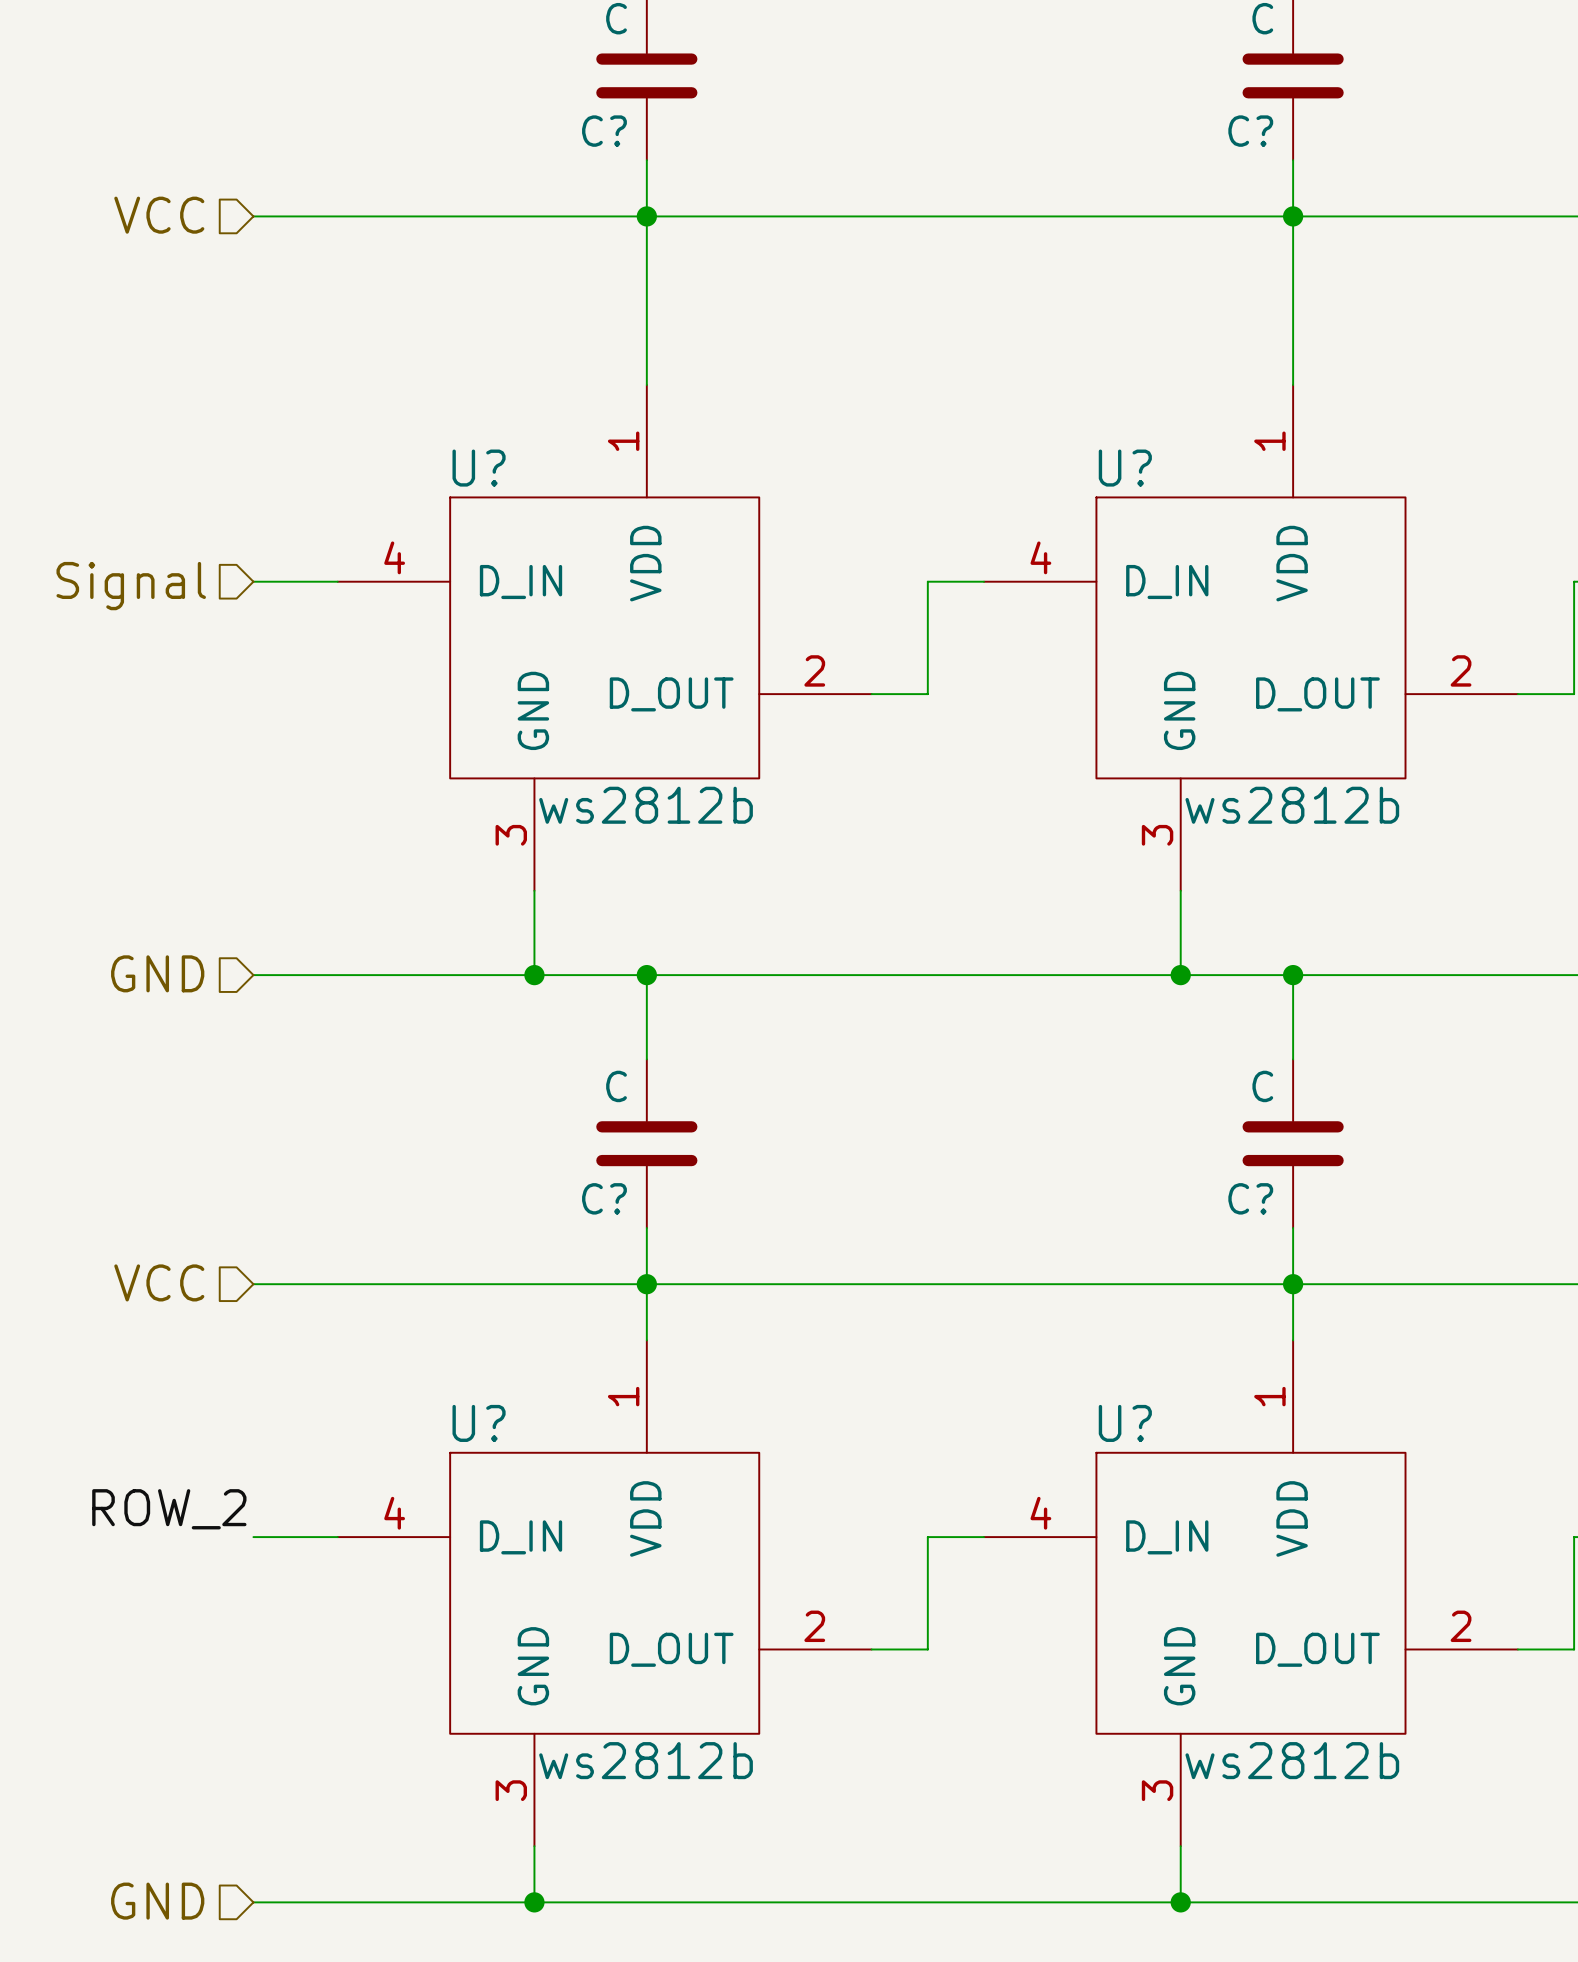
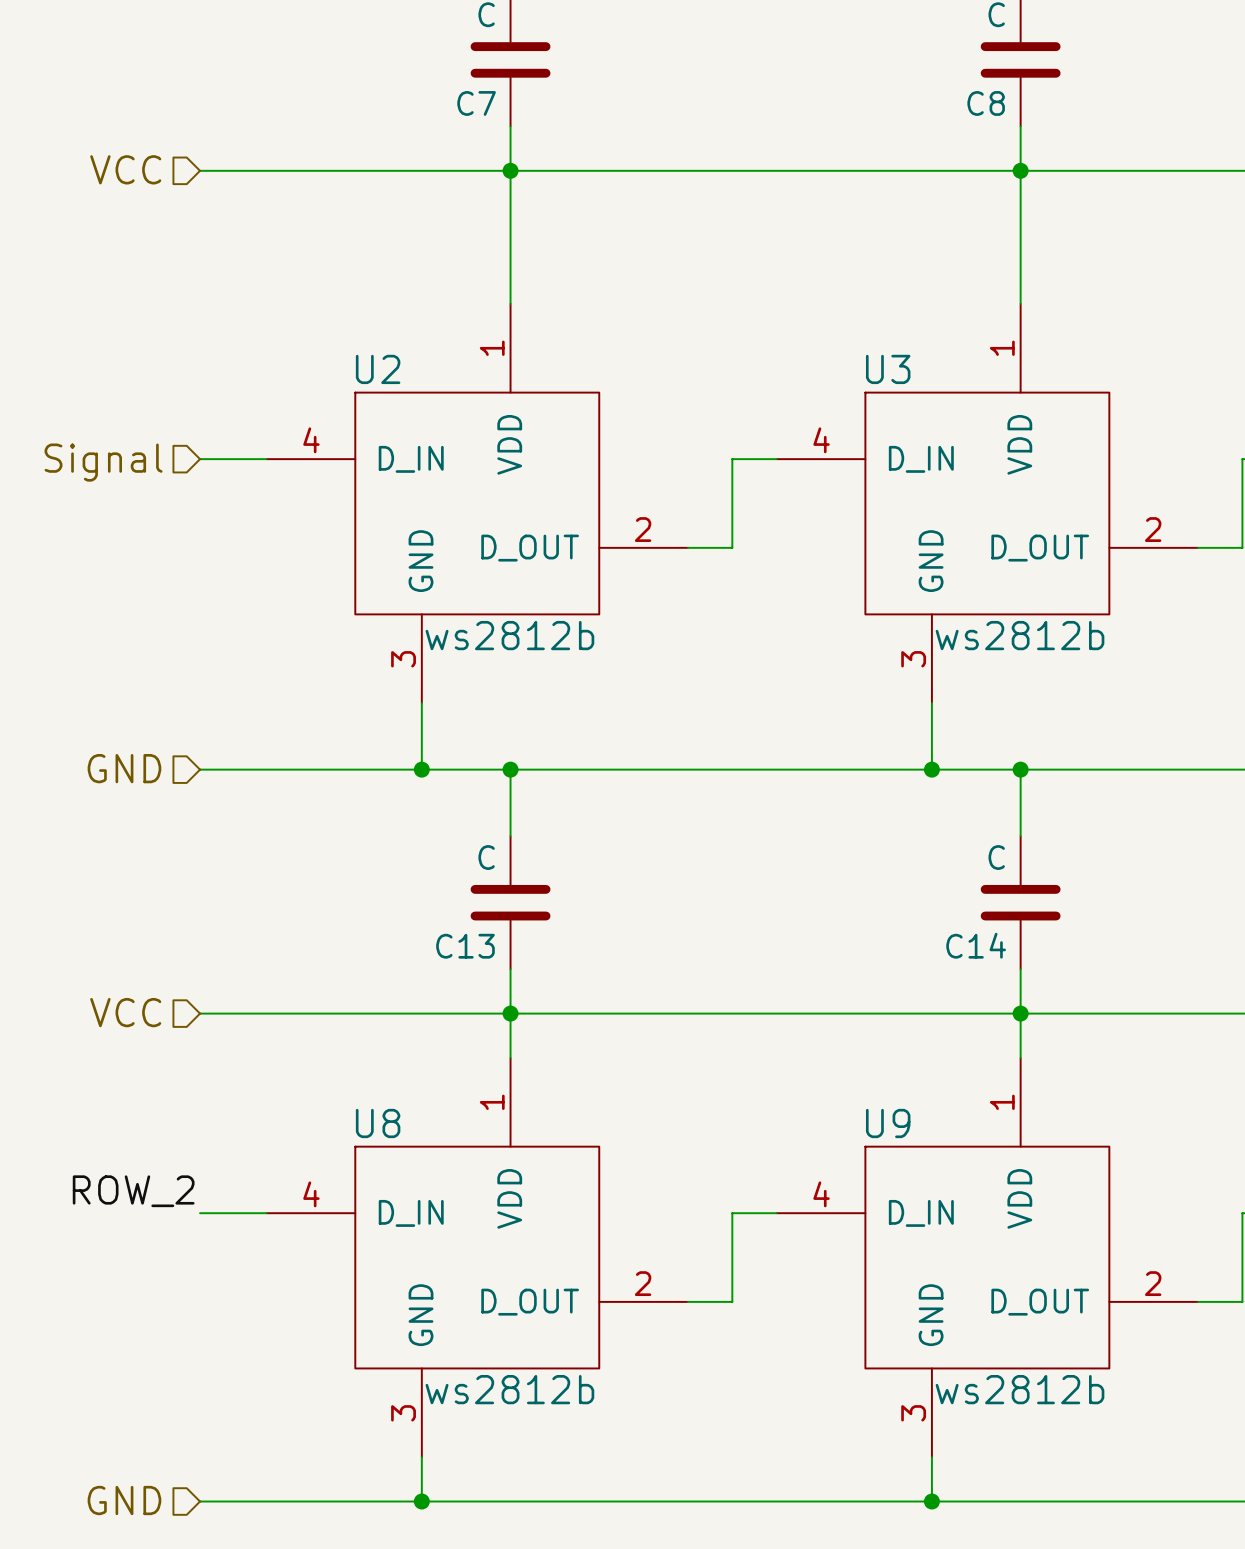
C? name: C? (604, 131) -> C7 (476, 103)
C? name: C? (1250, 131) -> C8 (986, 103)
U? name: U? (479, 468) -> U2 (378, 369)
U? name: U? (1125, 468) -> U3 (888, 369)
C? name: C? (604, 1198) -> C13 (465, 946)
C? name: C? (1250, 1198) -> C14 (976, 945)
U? name: U? (479, 1423) -> U8 (378, 1123)
U? name: U? (1125, 1423) -> U9 (888, 1123)

